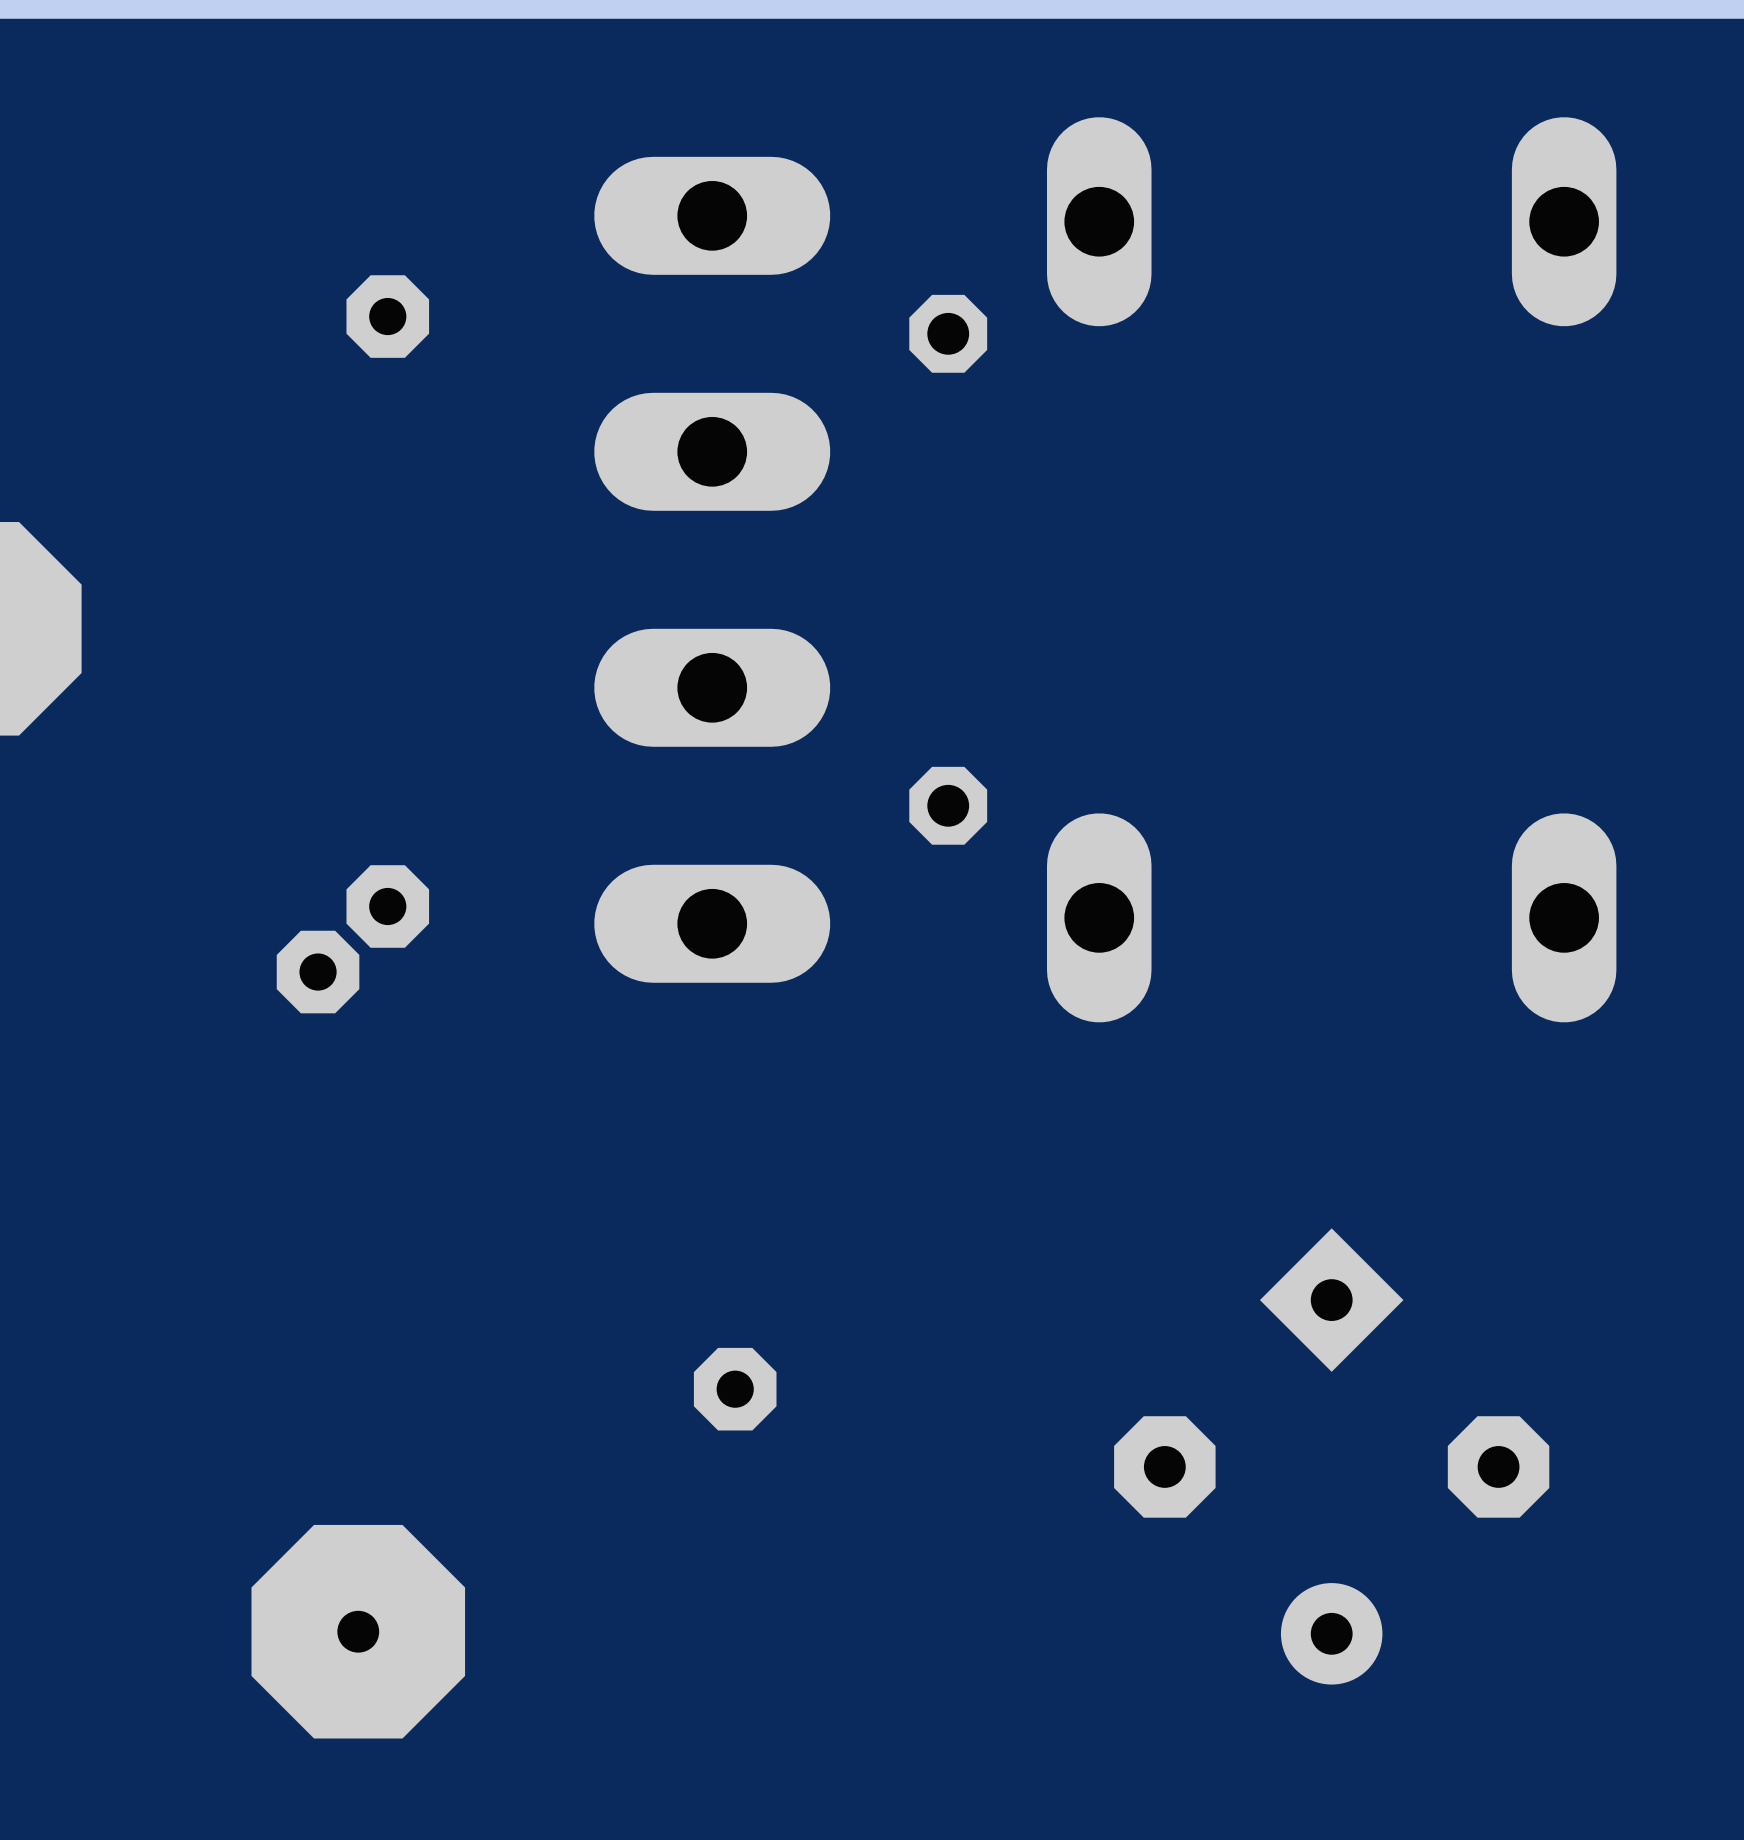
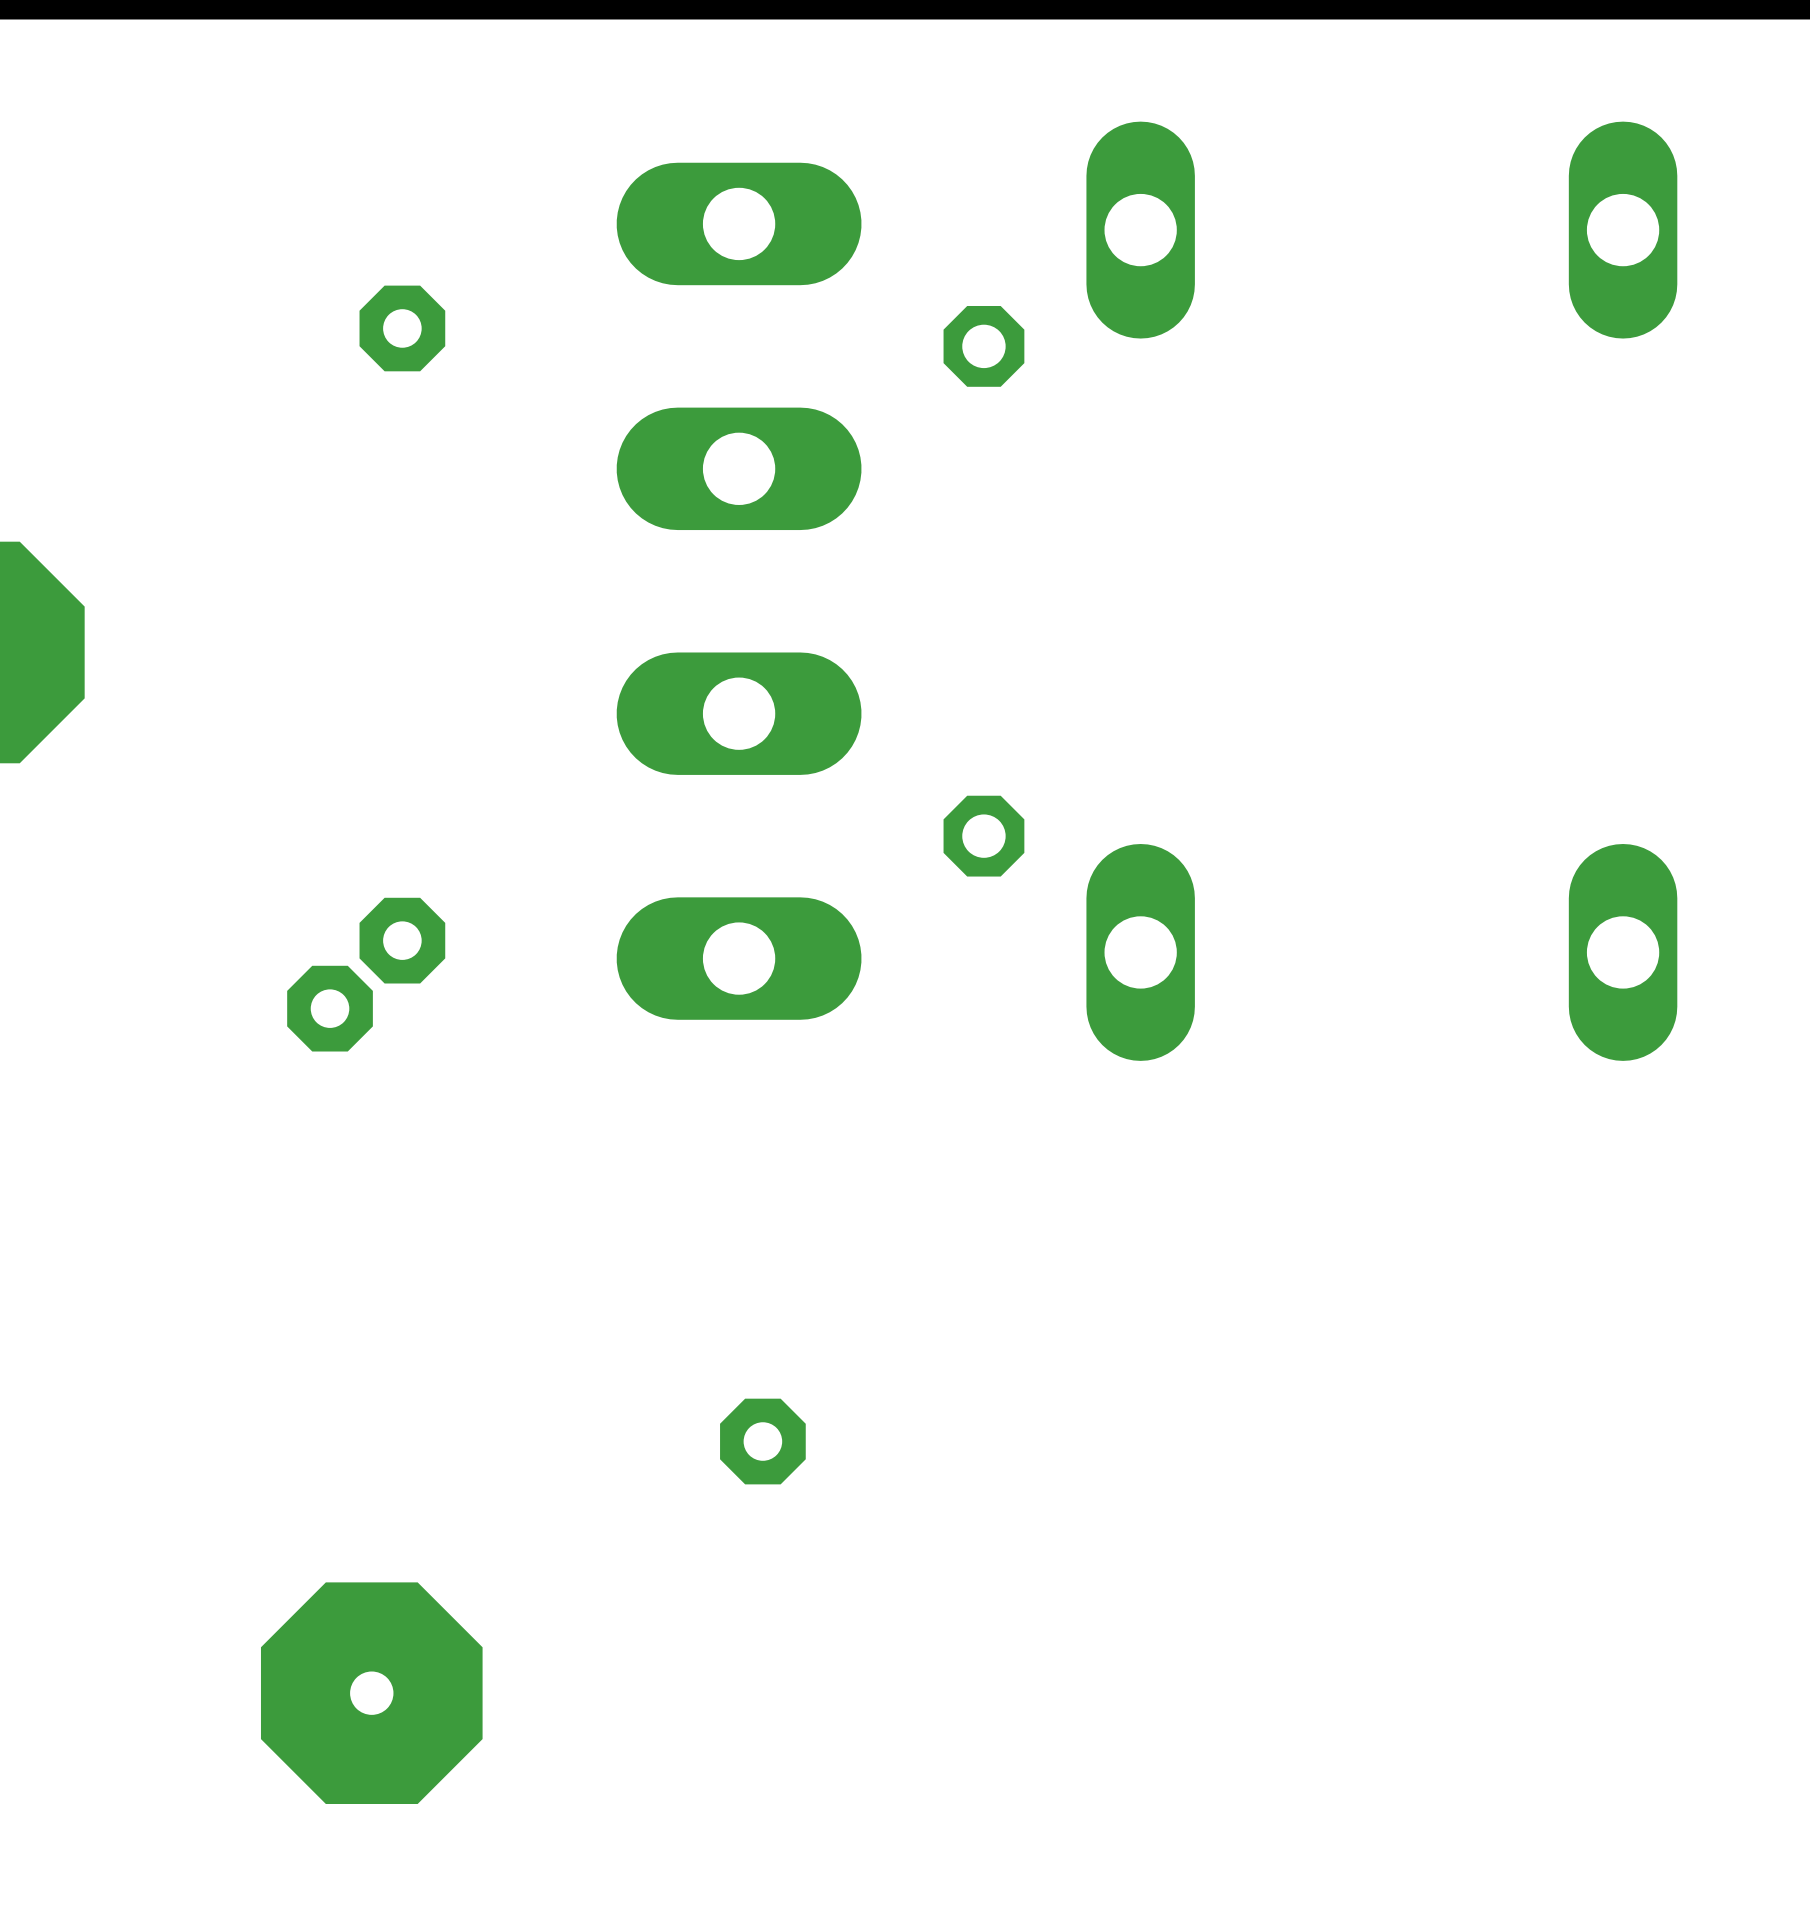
part: (1331, 1456) -> none

